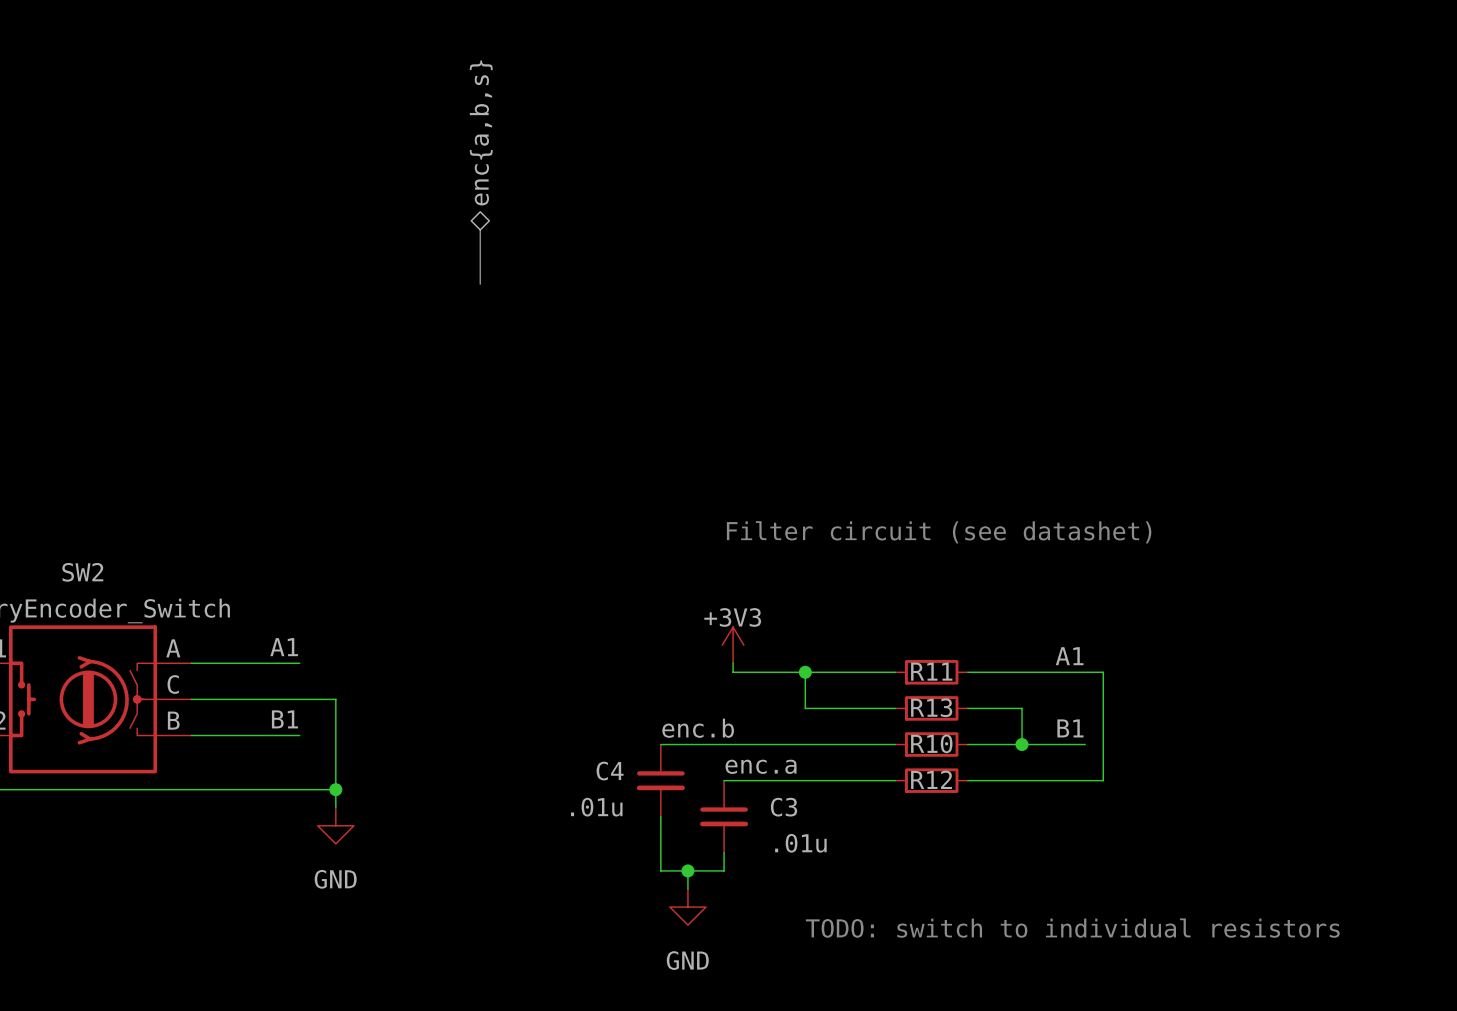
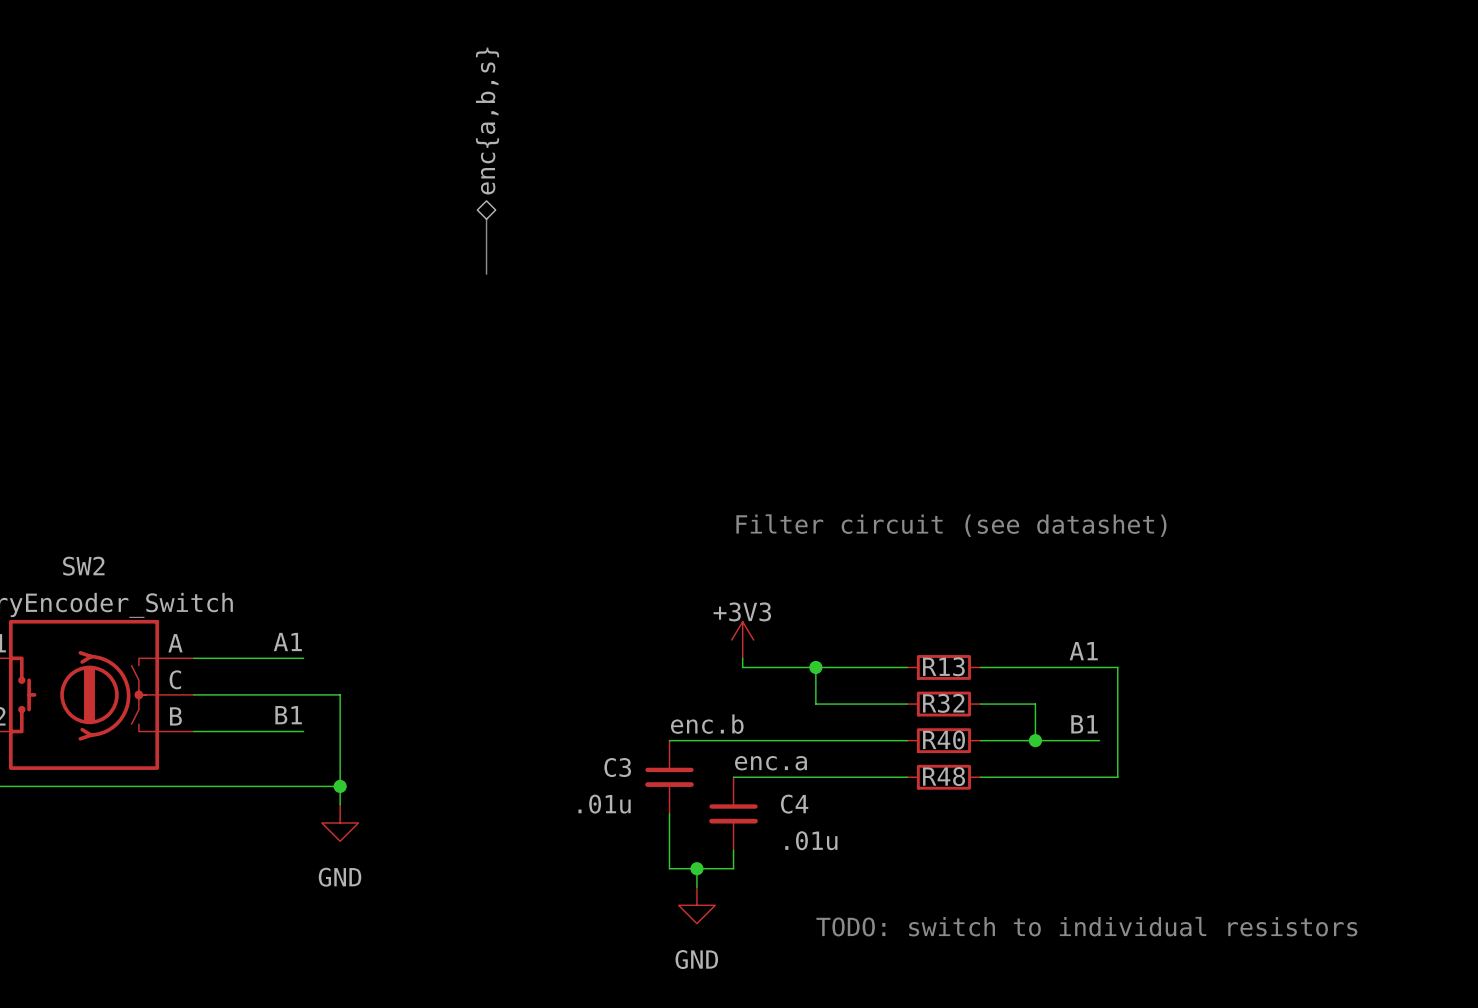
R11 name: R11 (931, 671) -> R13 (943, 666)
R13 name: R13 (931, 707) -> R32 (943, 703)
R10 name: R10 (931, 743) -> R40 (944, 739)
C4 name: C4 (610, 771) -> C3 (617, 767)
R12 name: R12 (931, 779) -> R48 (944, 776)
C3 name: C3 (784, 807) -> C4 (794, 804)

